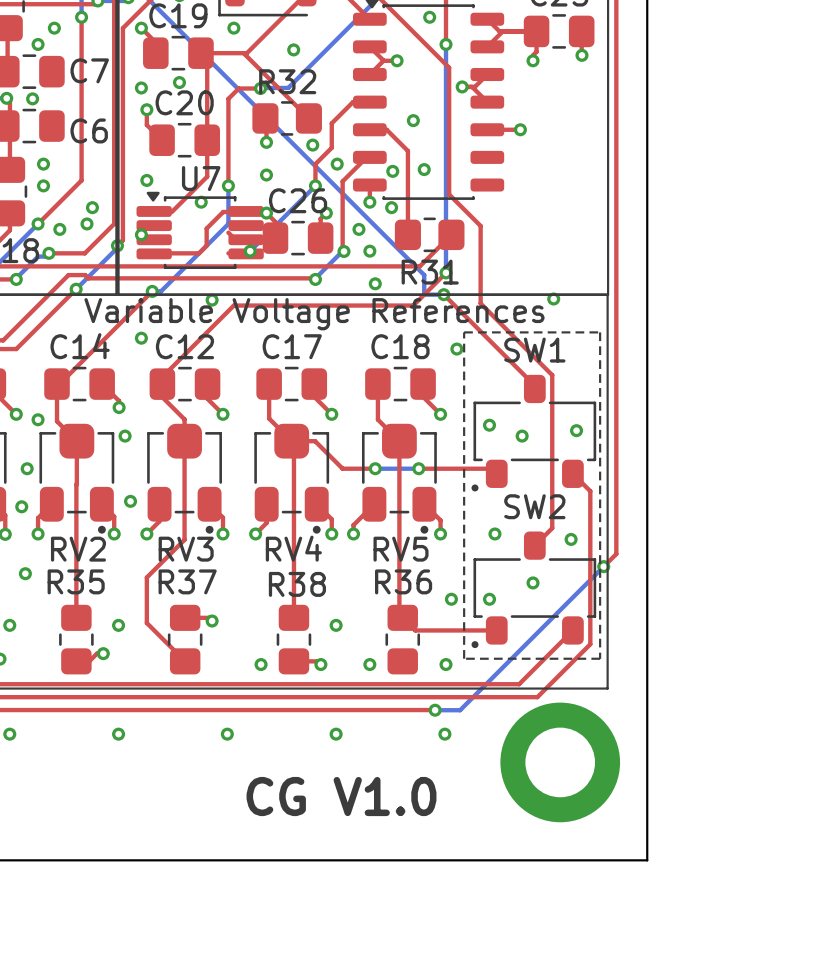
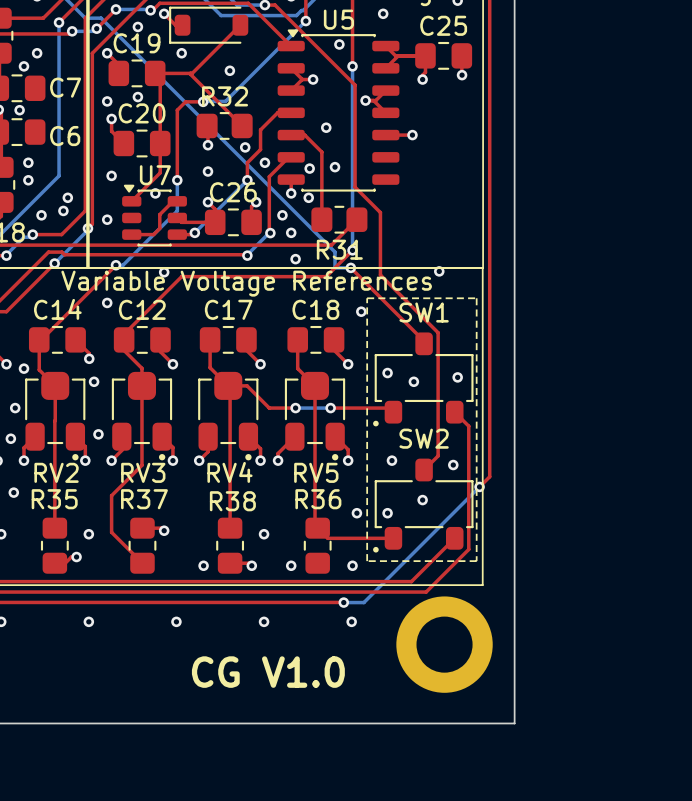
top track: (81, 17) (81, 180) (38, 223) -> none
bottom track: none -> (59, 44) (59, 175) (23, 210)
via: (81, 17) -> none
U7 footprint: [136, 191, 264, 270] -> [122, 184, 187, 247]
via: (38, 223) -> none

